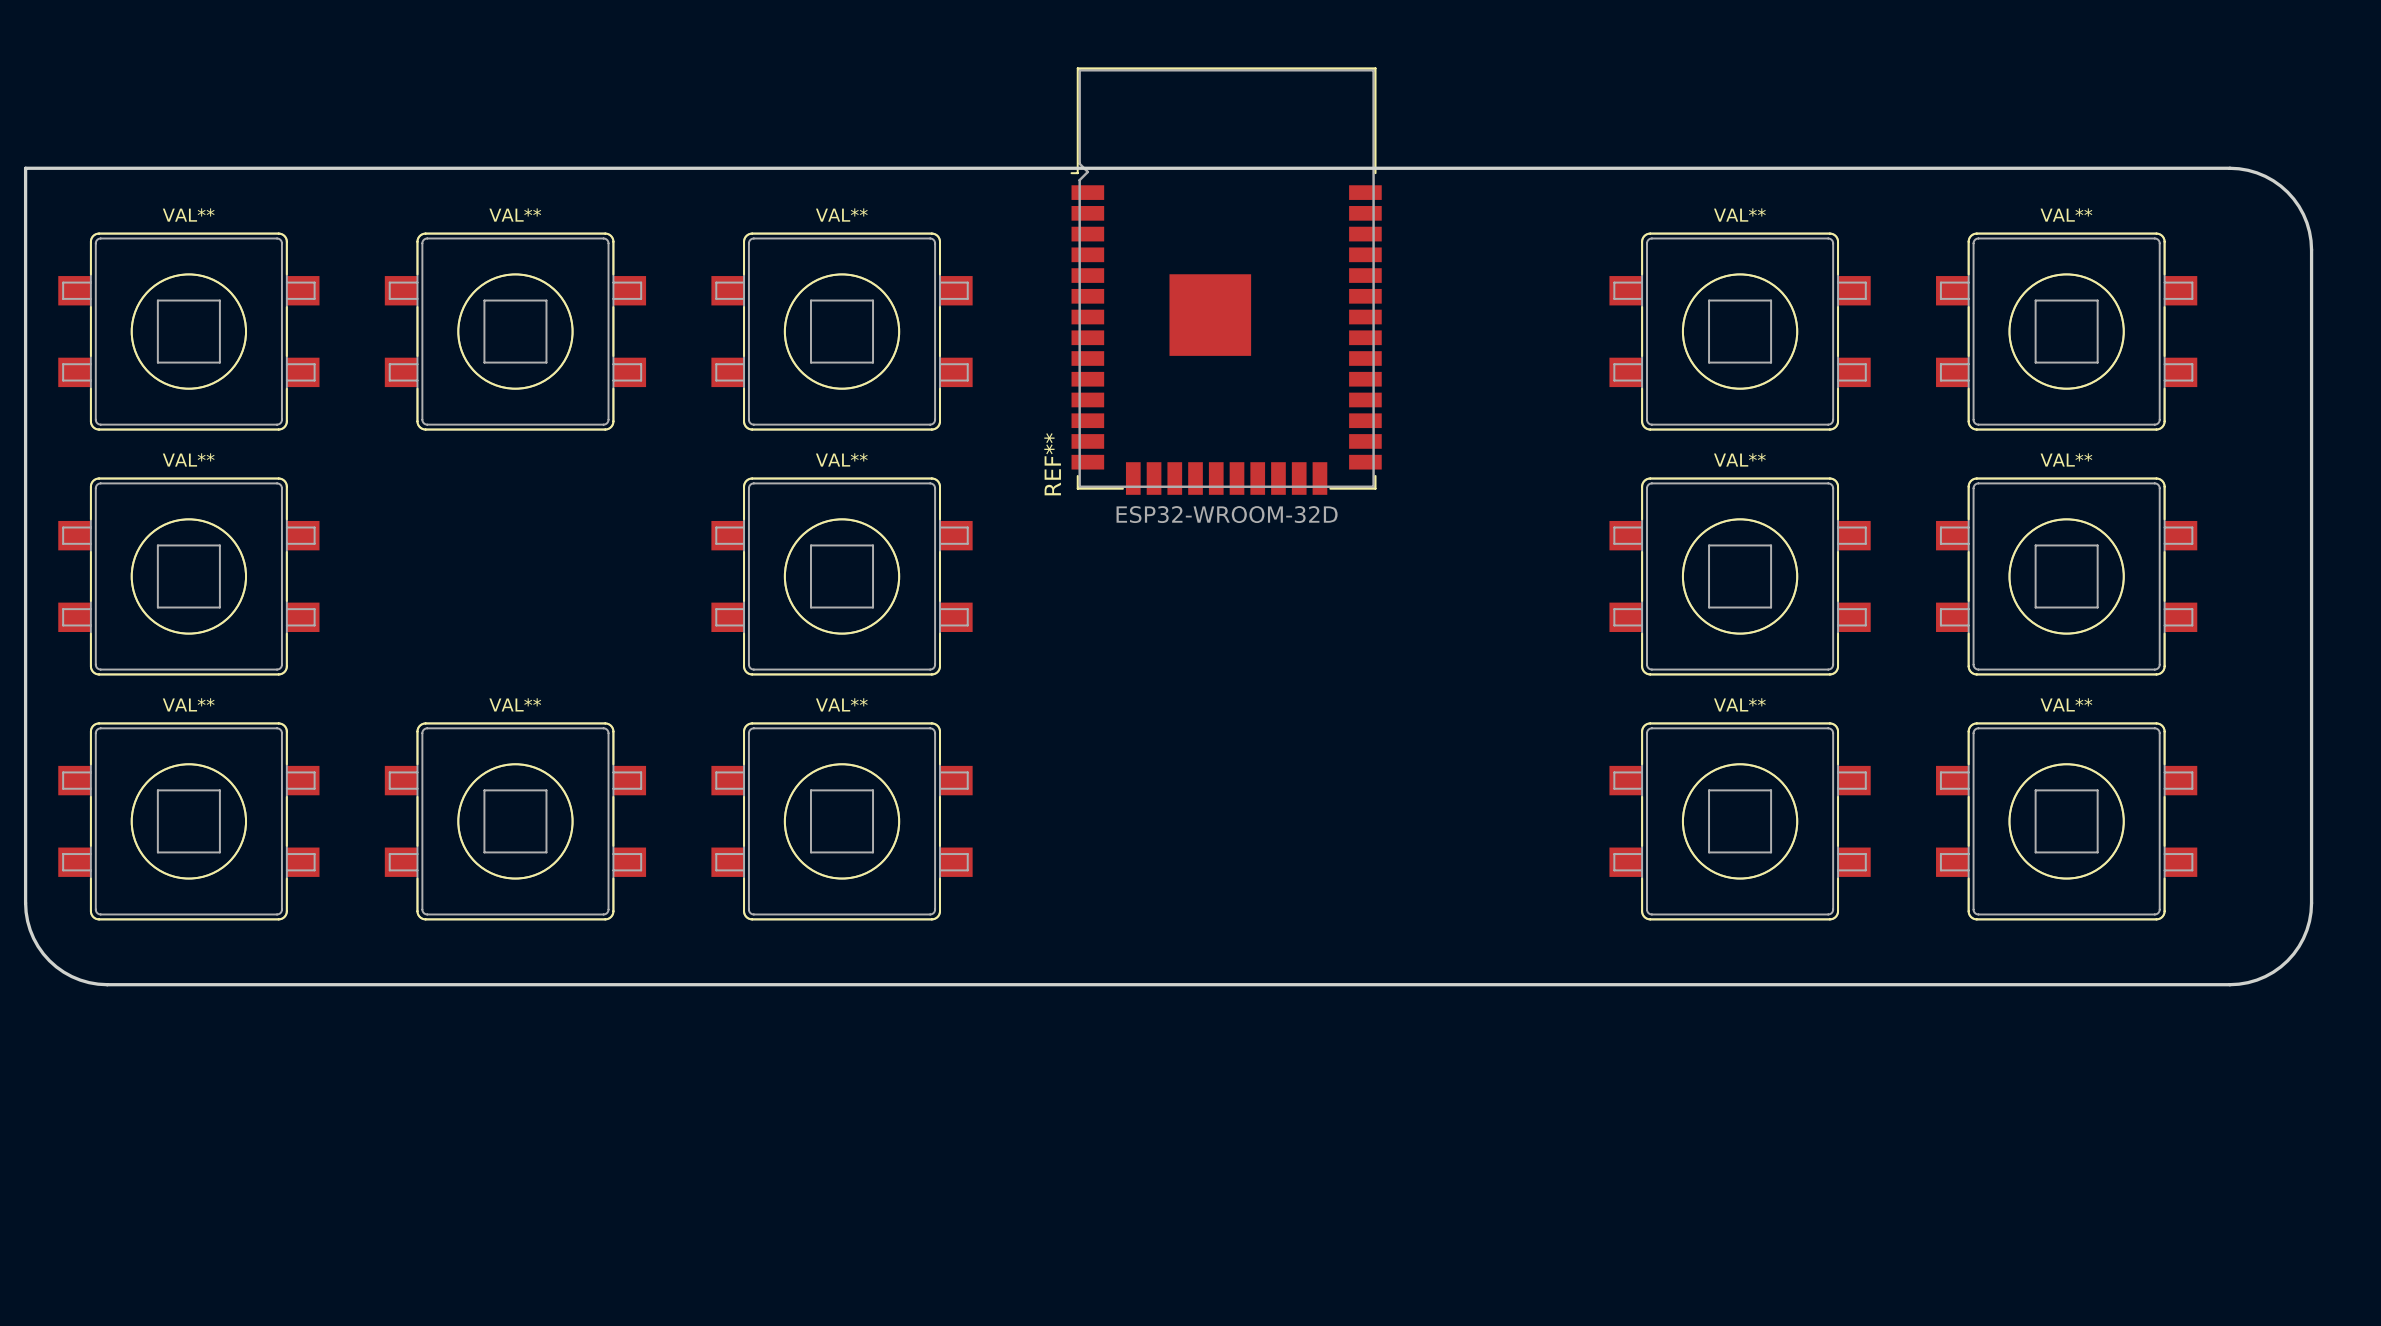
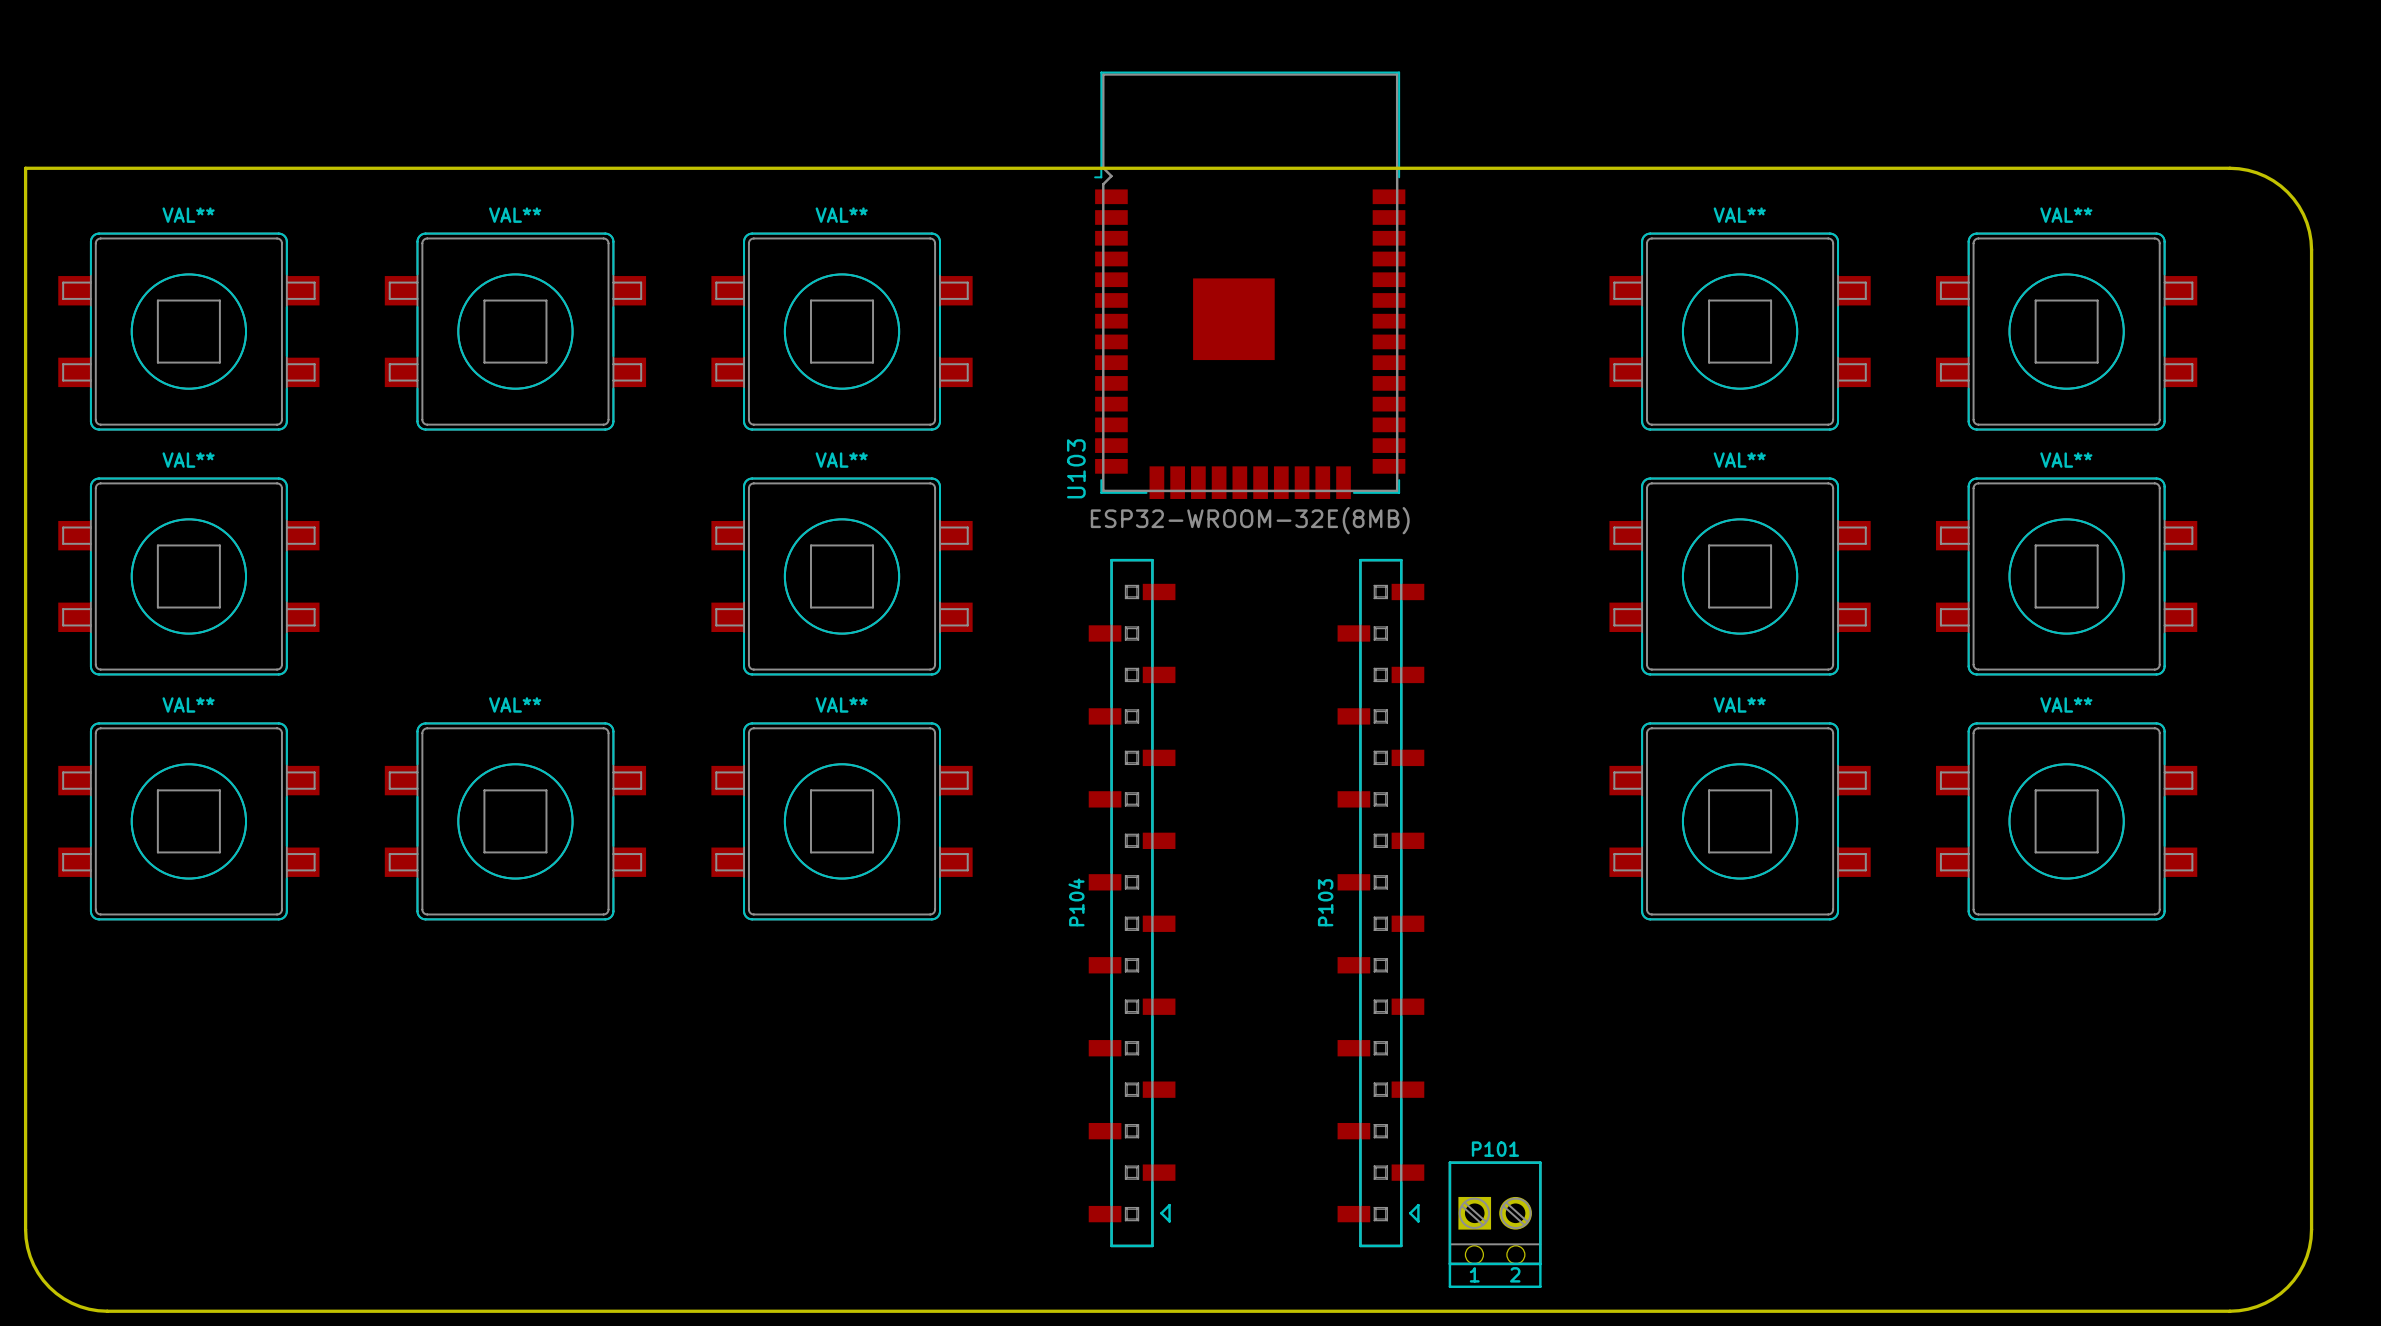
REF**: ESP32-WROOM-32D (1226, 281) -> none
U103: none -> ESP32-WROOM-32E(8MB) (1249, 285)
board edge: (25, 903) (30, 930) (38, 946) (49, 960) (63, 972) (80, 980) (107, 984) (2229, 984) (2256, 980) (2273, 972) (2287, 960) (2299, 946) (2306, 930) (2311, 903) -> (25, 903) (25, 1229) (27, 1247) (38, 1273) (56, 1293) (80, 1306) (107, 1311) (2229, 1311) (2248, 1309) (2273, 1298) (2293, 1280) (2306, 1256) (2311, 1238) (2311, 903)
P104: none -> (1132, 903)
P103: none -> (1380, 903)
P101: none -> (1495, 1224)

